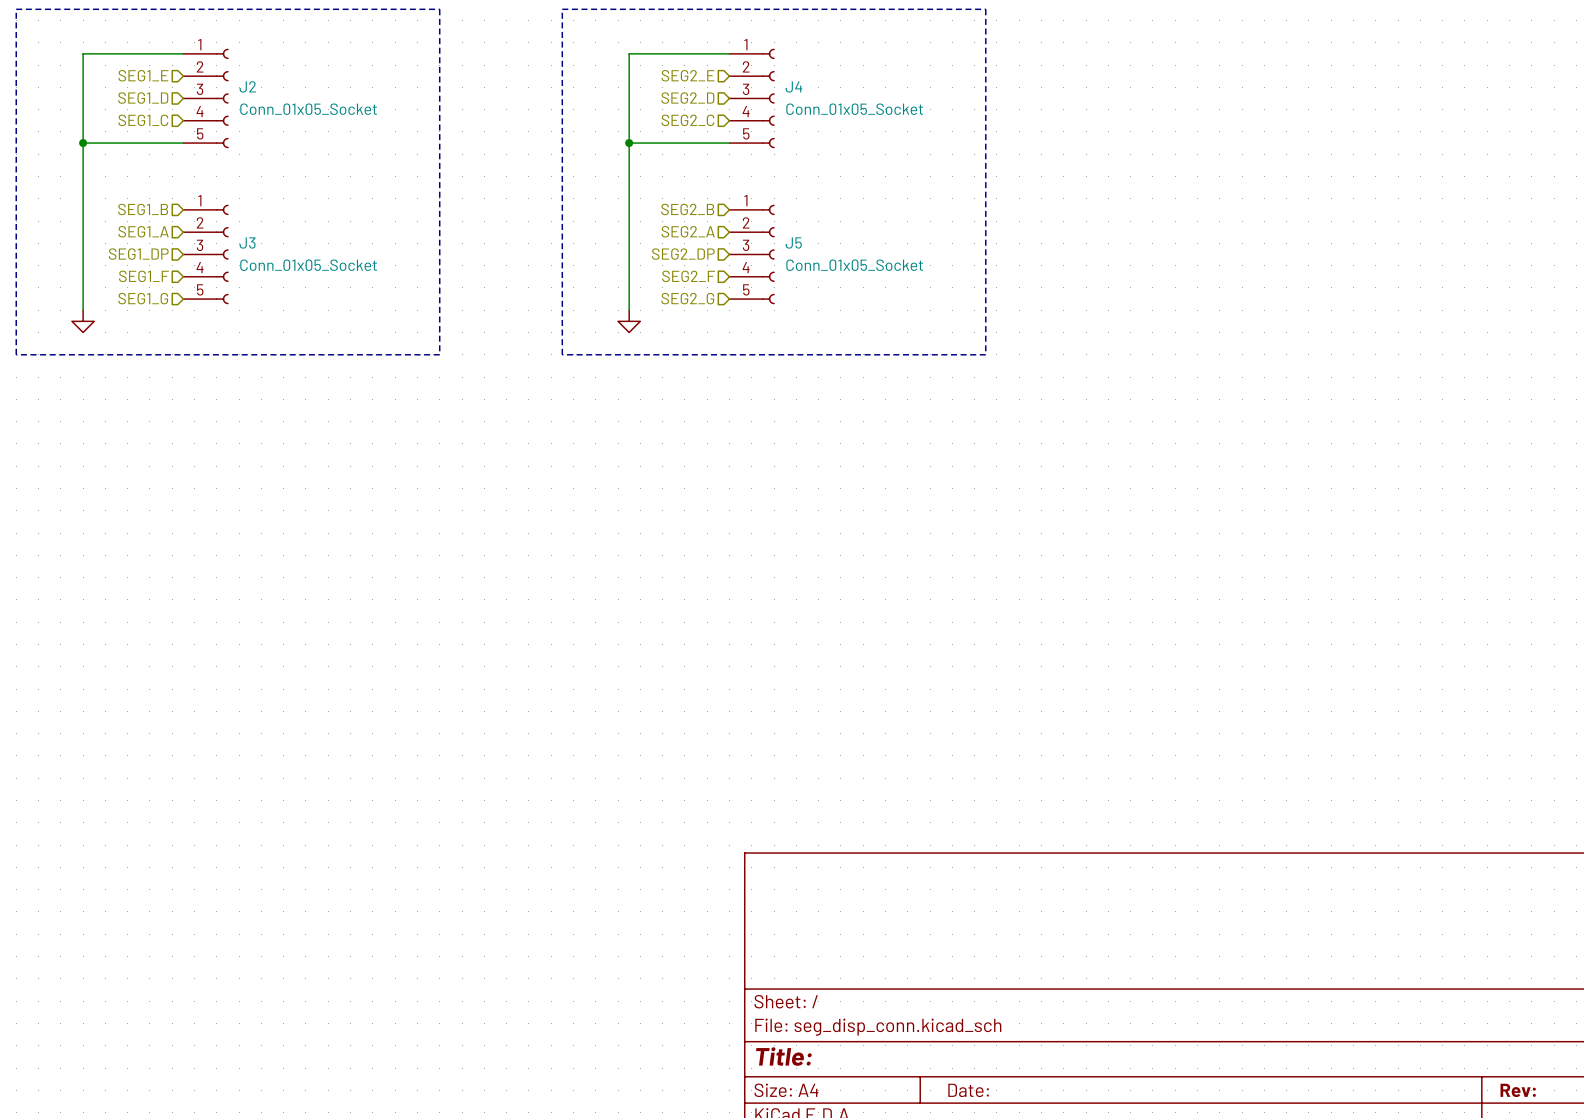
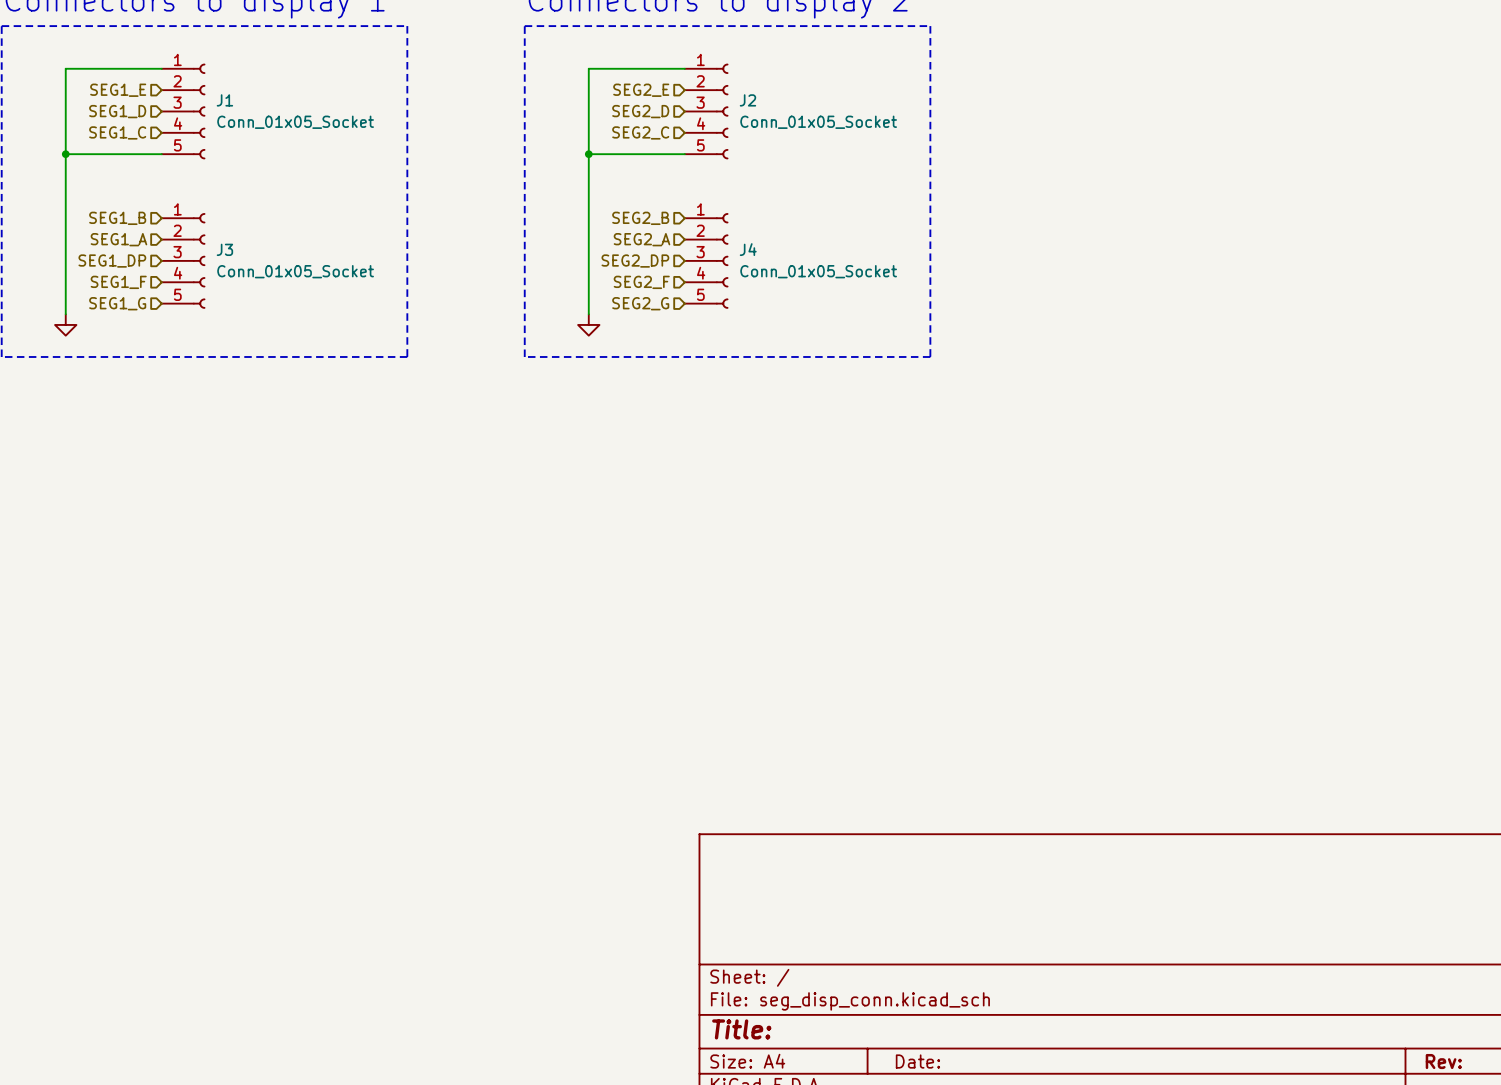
J2 name: J2 (247, 86) -> J1 (224, 100)
J4 name: J4 (793, 86) -> J2 (747, 100)
J5 name: J5 (793, 242) -> J4 (748, 249)

